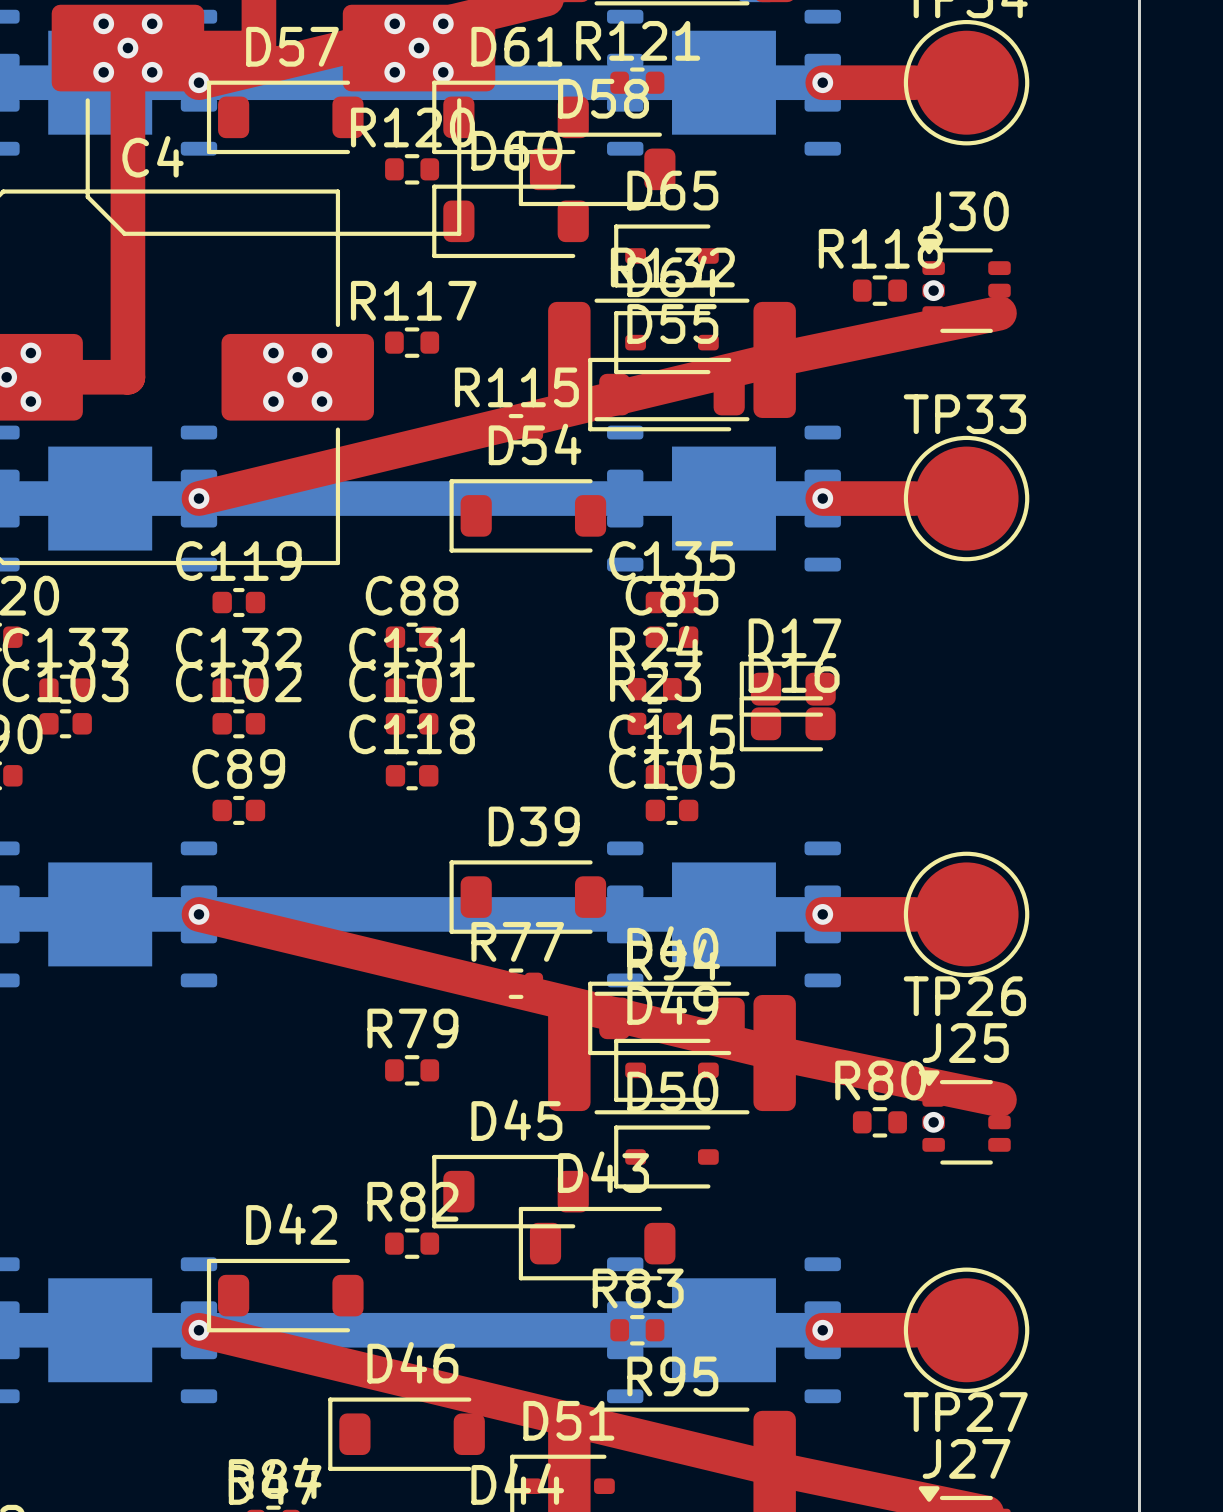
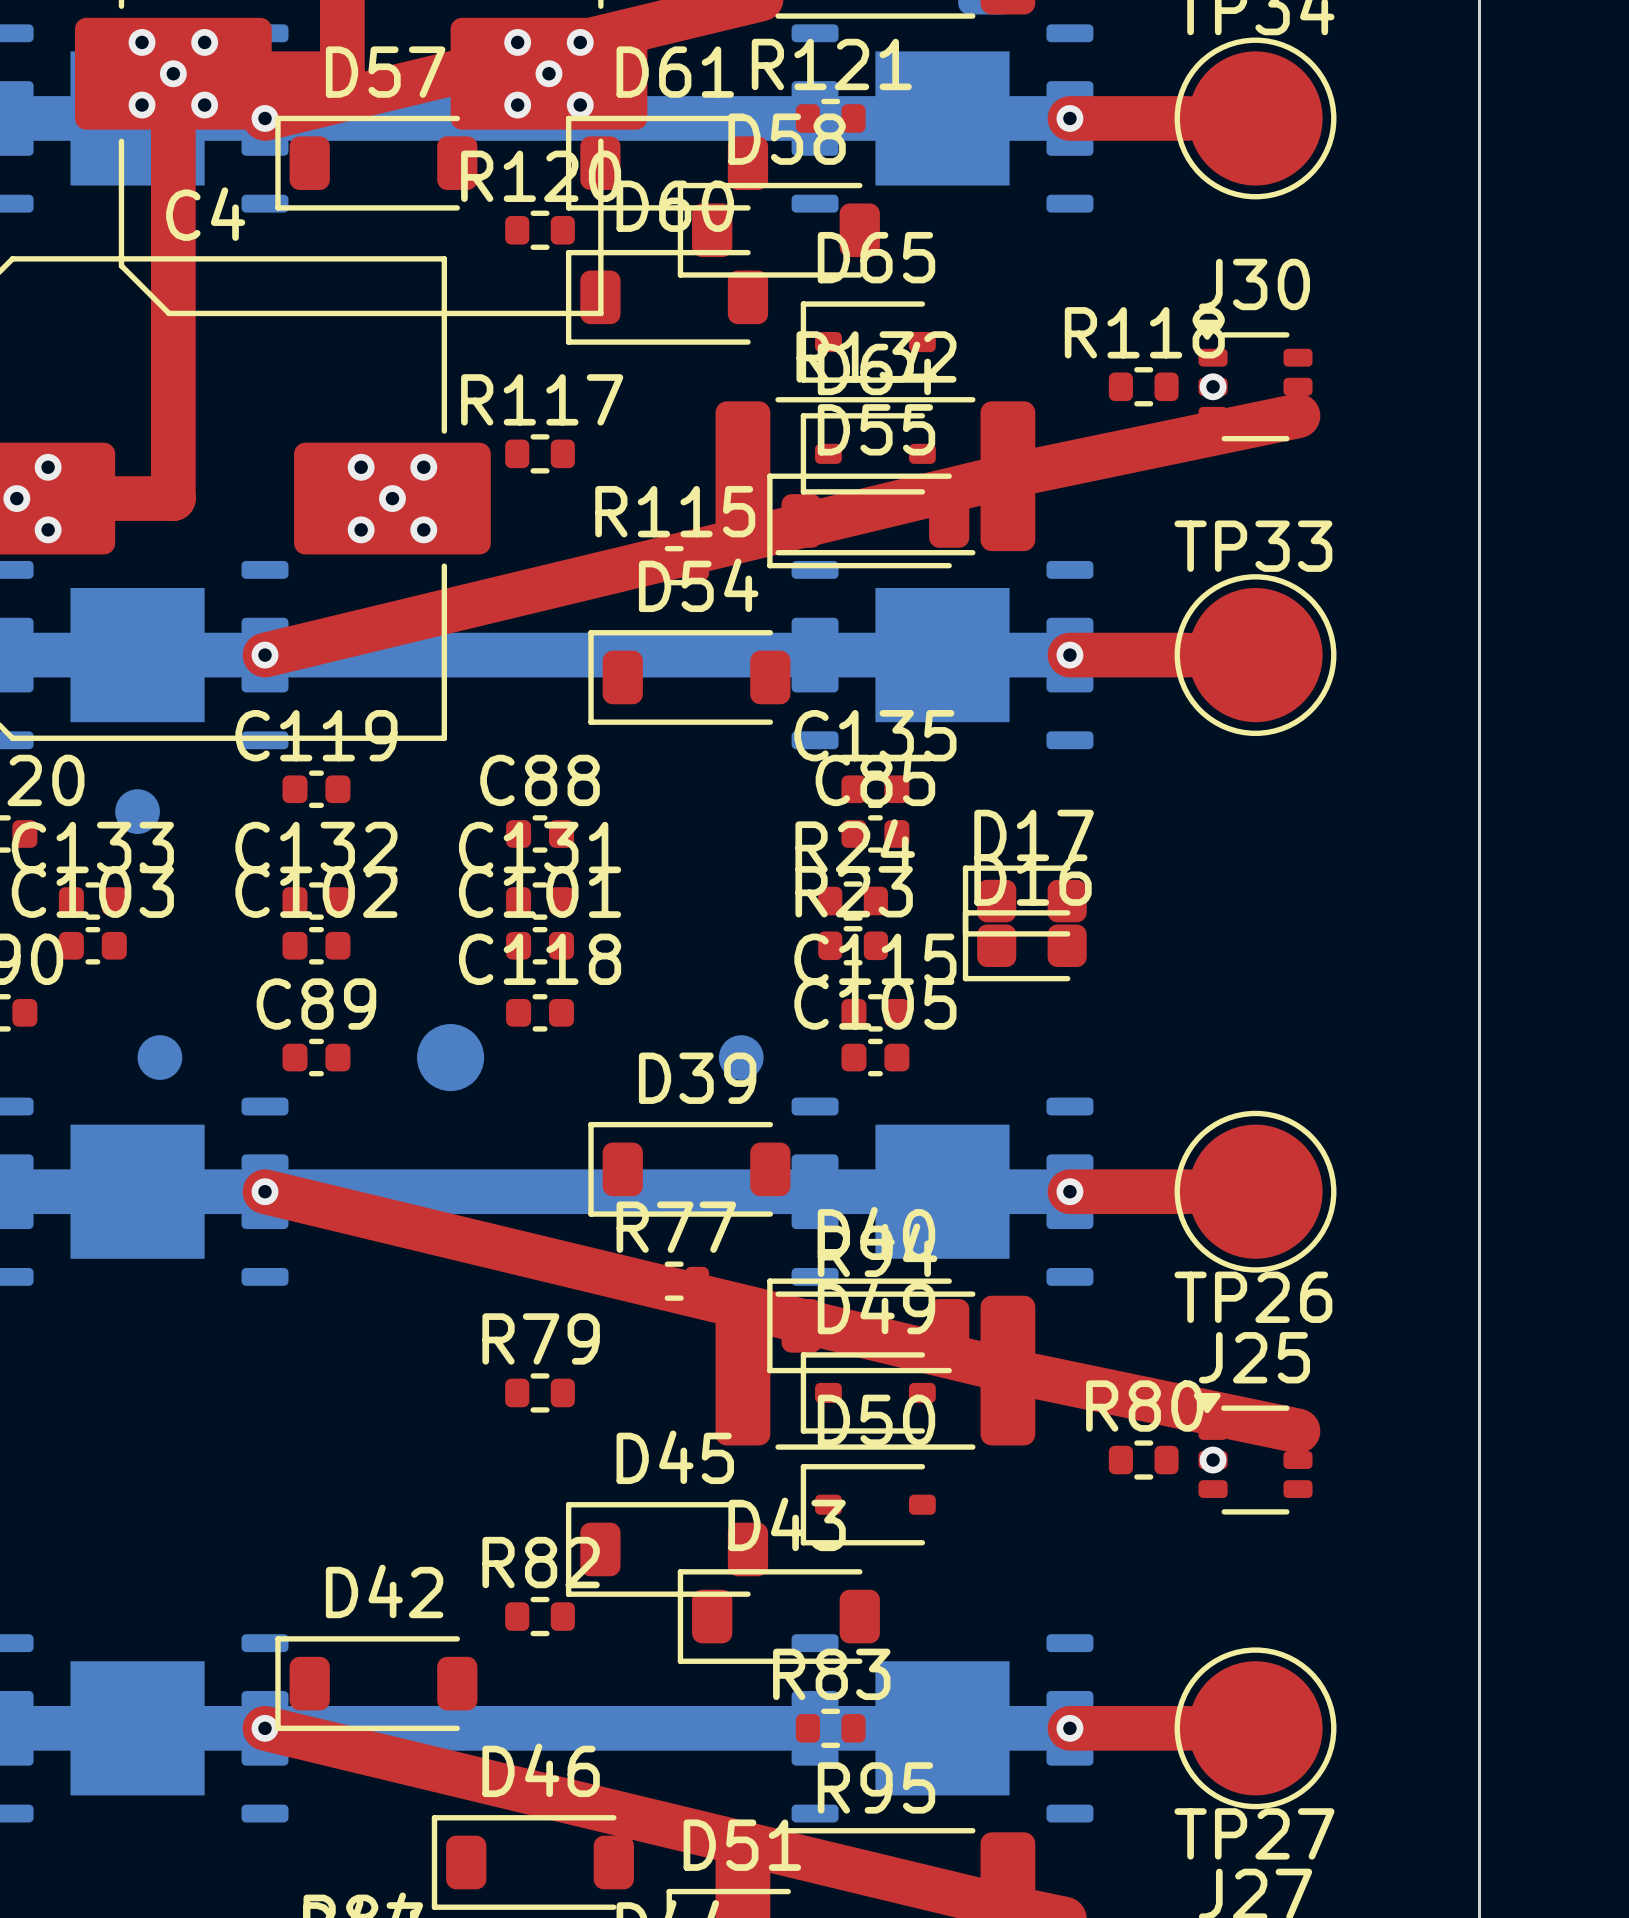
part: none -> (137, 811)
part: none -> (159, 1057)
part: none -> (450, 1057)
part: none -> (741, 1057)

